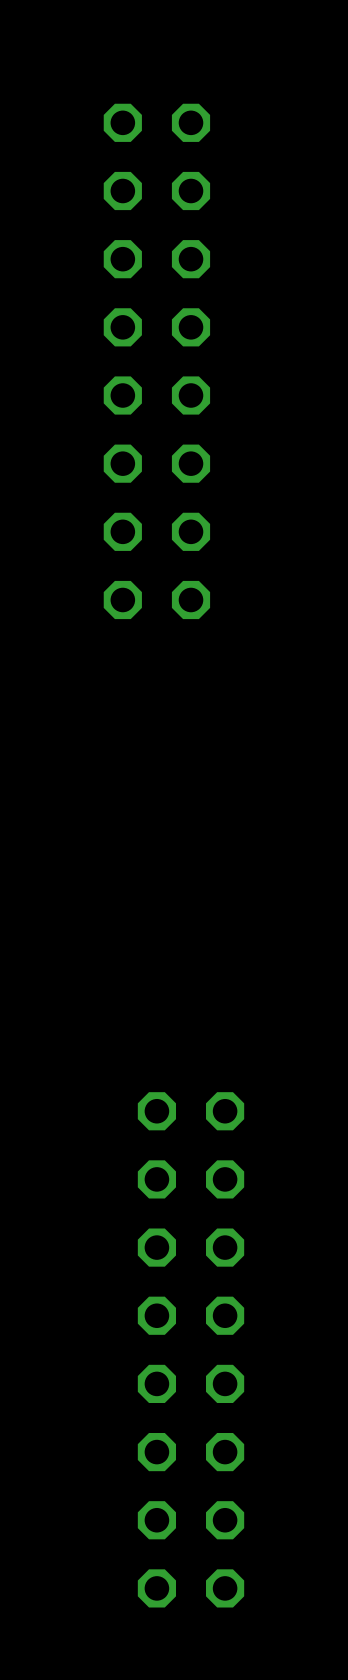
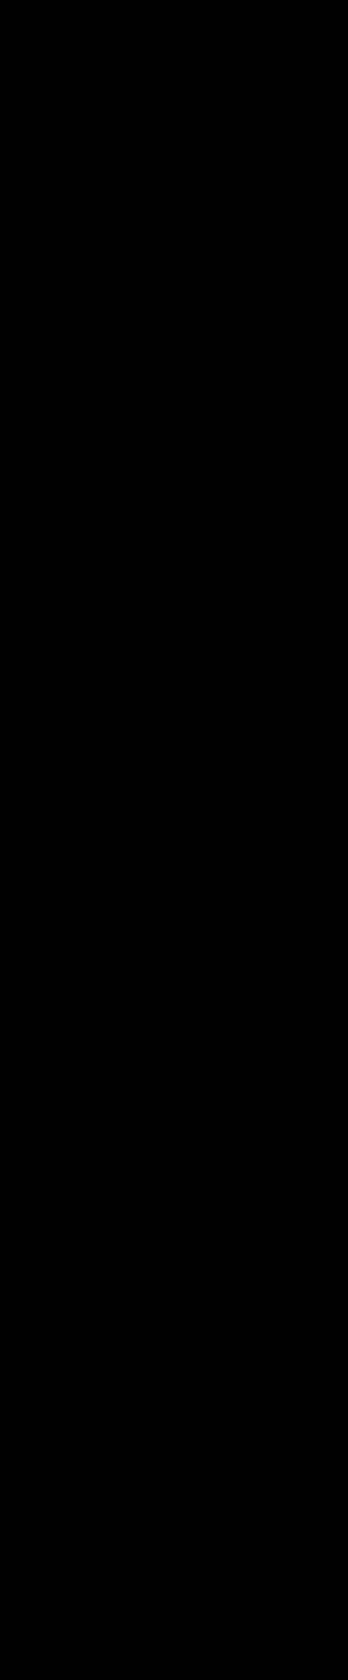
part: (156, 361) -> none
part: (191, 1349) -> none

